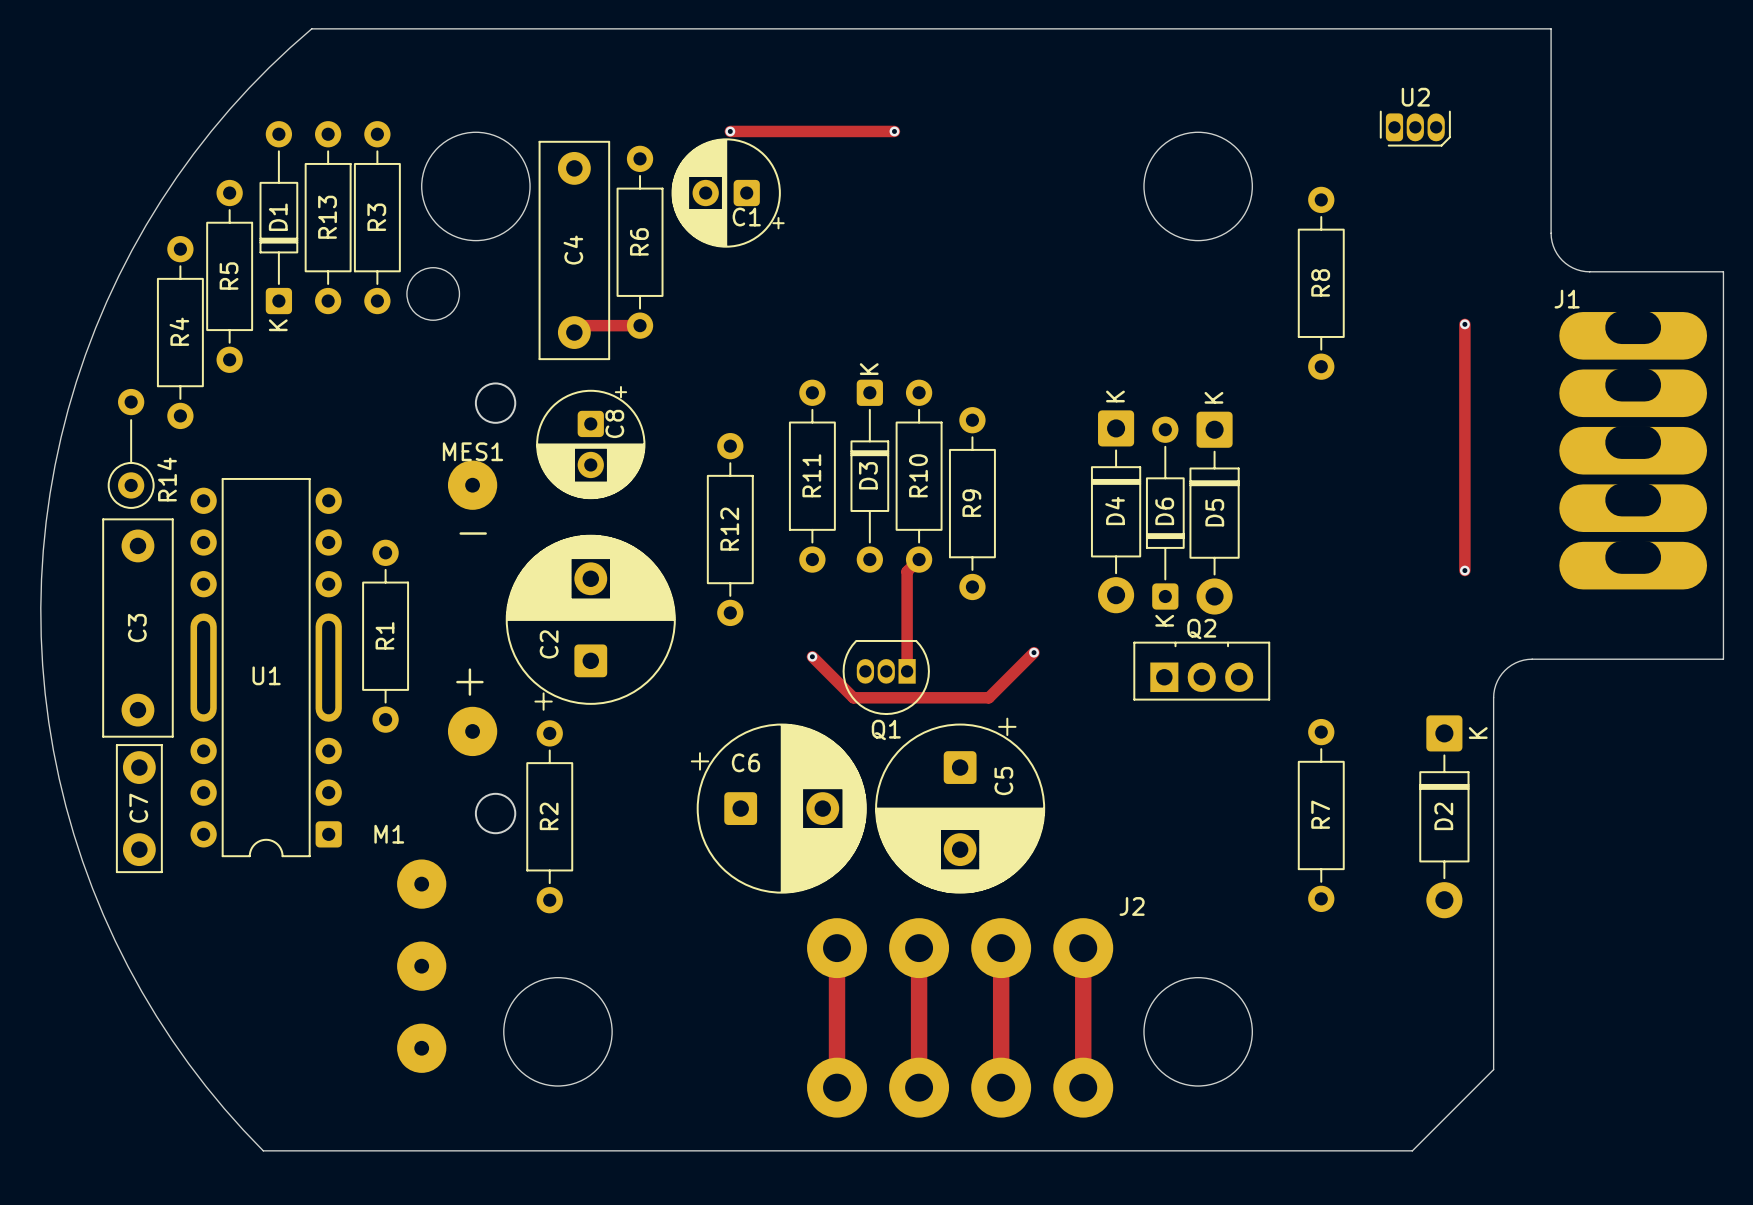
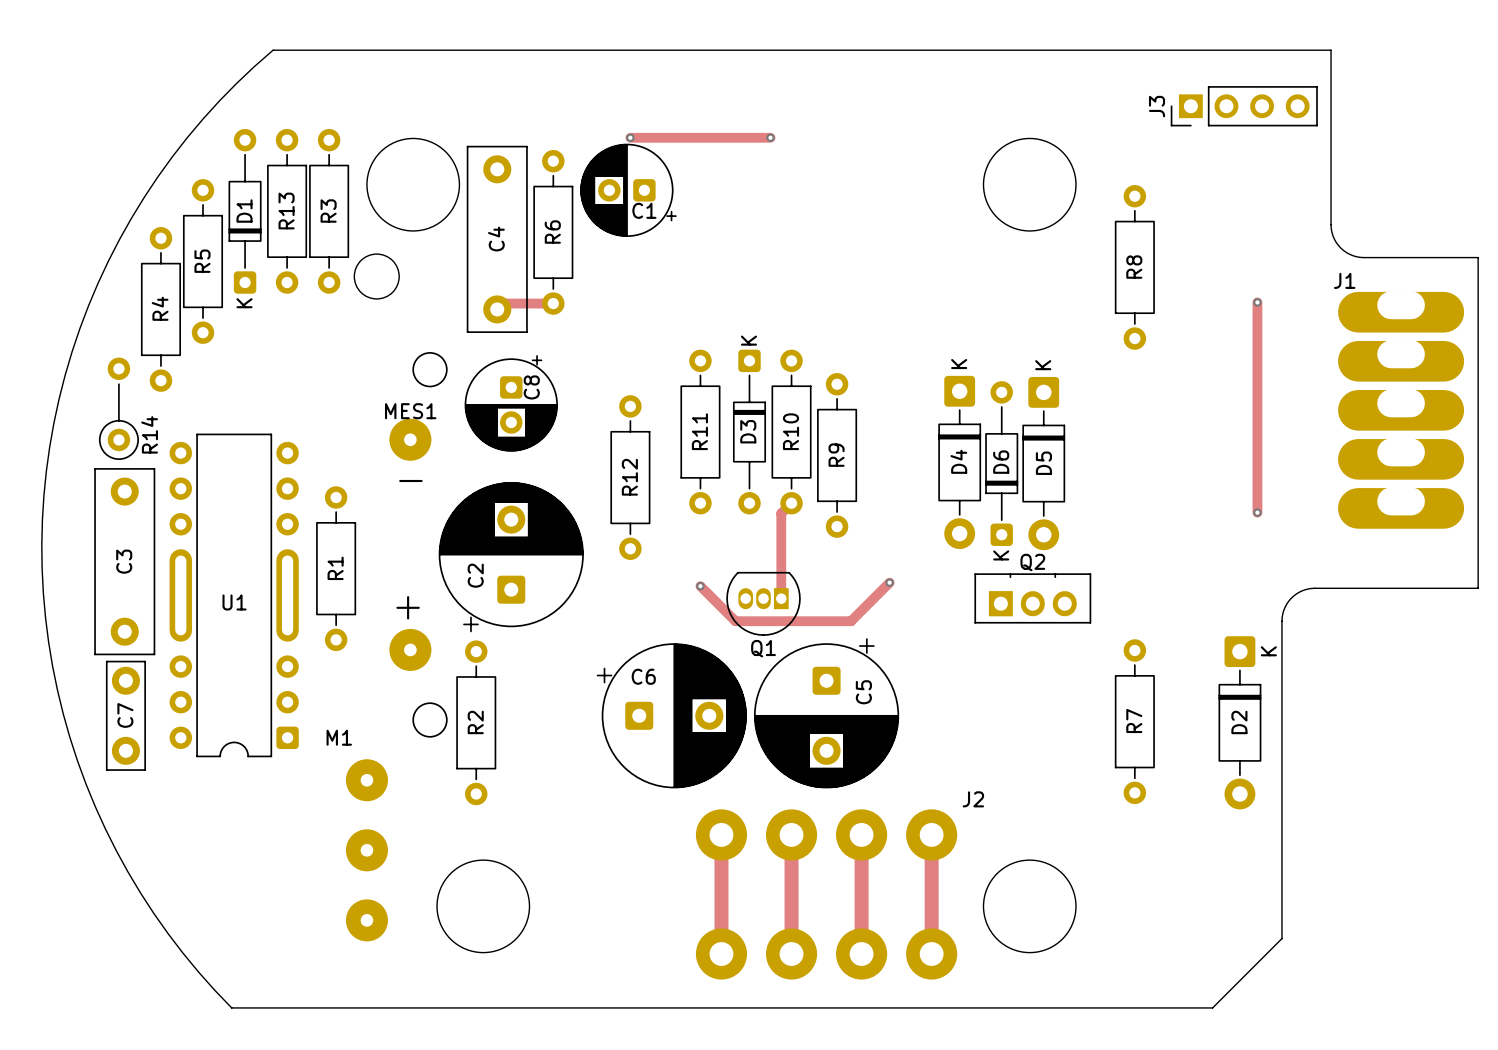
J3: none -> (1244, 106)
U2: (1415, 128) -> none

